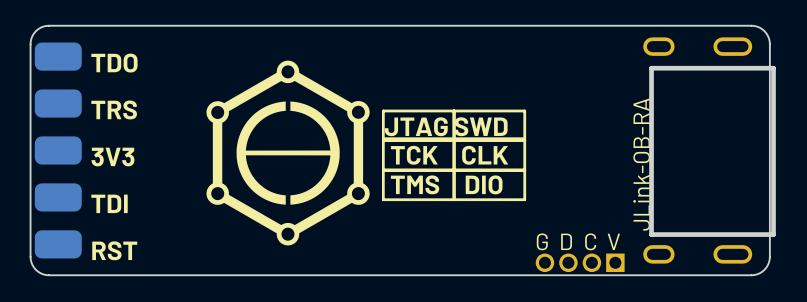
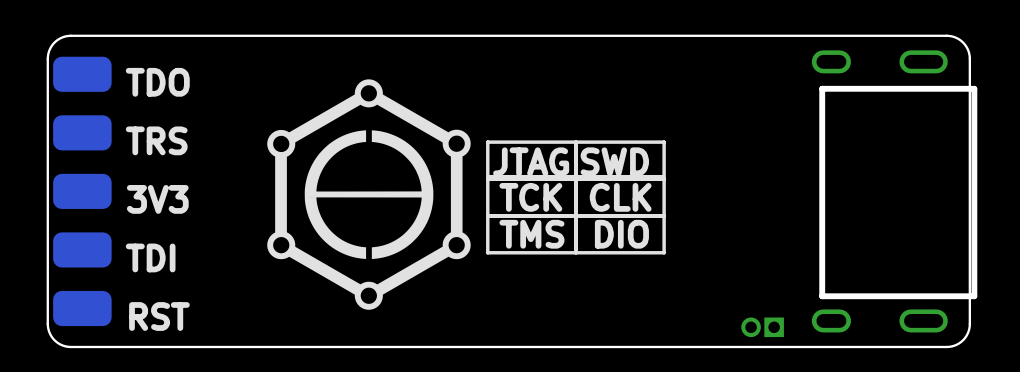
text: JLink-OB-RA (641, 164) -> none
text: G (542, 241) -> none
text: D (566, 241) -> none
text: C (590, 241) -> none
text: V (613, 241) -> none
part: none -> (762, 327)
part: (580, 262) -> none

